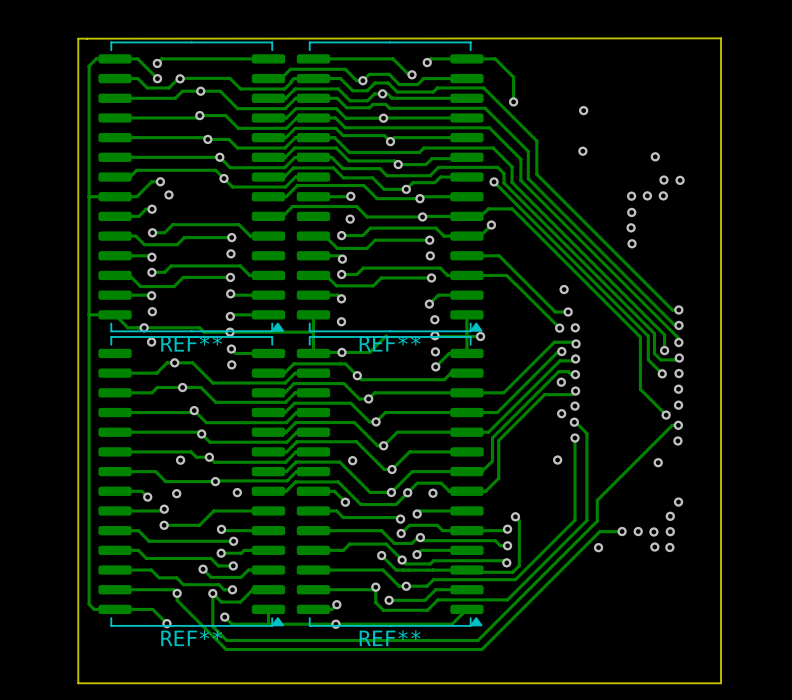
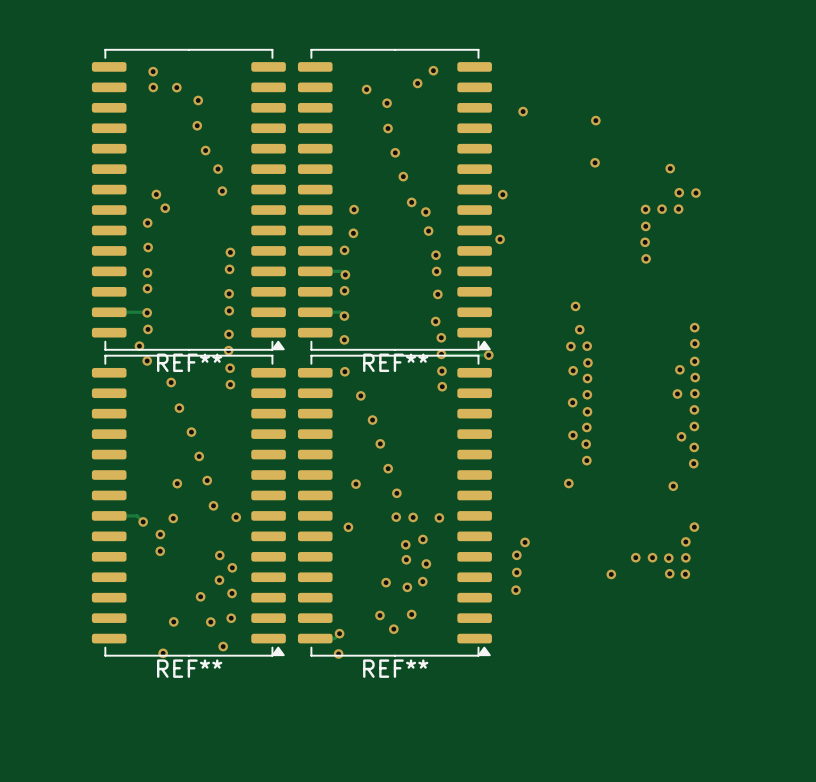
board edge: (78, 38) (721, 38) (721, 683) (78, 683) (78, 38) -> none
track: (268, 58) (161, 58) (157, 63) -> none
track: (313, 58) (393, 58) (408, 74) (412, 74) -> none
track: (427, 62) (430, 58) (495, 58) (513, 77) (513, 101) -> none
track: (115, 78) (137, 78) (147, 87) (168, 87) (180, 78) (229, 78) (240, 88) (284, 88) (293, 78) (340, 78) (352, 90) (367, 90) (374, 83) (388, 83) (397, 92) (433, 92) (437, 87) (483, 87) (536, 140) (536, 174) (672, 309) (678, 309) -> none
track: (157, 78) (137, 58) (96, 58) (89, 66) (89, 604) (94, 609) (152, 609) (166, 623) -> none
track: (466, 78) (423, 78) (417, 84) (399, 84) (389, 74) (369, 74) (362, 80) (356, 80) (345, 69) (290, 69) (281, 78) (268, 78) -> none
track: (391, 97) (387, 93) (374, 93) (367, 100) (350, 100) (338, 88) (295, 88) (285, 98) (268, 98) -> none
track: (391, 97) (466, 98) -> none
track: (115, 98) (175, 98) (182, 91) (220, 91) (237, 108) (285, 108) (295, 98) (337, 98) (346, 107) (369, 107) (372, 104) (385, 104) (389, 108) (485, 108) (528, 151) (528, 178) (674, 325) (679, 325) -> none
track: (115, 117) (197, 117) (199, 115) (225, 115) (238, 128) (286, 128) (296, 117) (335, 117) (345, 127) (489, 127) (520, 159) (520, 180) (678, 338) (678, 342) -> none
track: (466, 117) (345, 118) (336, 108) (295, 108) (286, 117) (268, 117) -> none
track: (115, 137) (228, 139) (237, 148) (285, 148) (295, 137) (334, 137) (349, 152) (419, 152) (423, 148) (493, 148) (512, 166) (512, 182) (664, 334) (664, 350) -> none
track: (466, 137) (394, 137) (390, 141) (384, 135) (343, 135) (335, 128) (295, 128) (285, 137) (268, 137) -> none
track: (219, 157) (230, 167) (284, 167) (295, 157) (331, 157) (342, 168) (379, 168) (386, 175) (430, 175) (438, 167) (497, 167) (503, 173) (503, 183) (654, 333) (654, 353) (660, 359) (677, 359) (679, 358) -> none
track: (219, 157) (115, 157) -> none
track: (466, 157) (431, 158) (426, 164) (398, 164) (394, 160) (349, 160) (336, 148) (294, 148) (285, 157) (268, 157) -> none
track: (313, 177) (295, 177) (285, 187) (232, 187) (215, 170) (136, 170) (129, 177) (115, 177) -> none
track: (466, 177) (440, 177) (434, 182) (412, 182) (406, 189) (384, 189) (372, 177) (343, 177) (333, 167) (293, 167) (284, 177) (268, 177) -> none
track: (160, 181) (151, 181) (136, 196) (89, 196) -> none
track: (494, 181) (648, 336) (648, 359) (662, 373) -> none
track: (350, 196) (313, 196) -> none
track: (466, 196) (377, 198) (363, 185) (297, 185) (286, 196) (268, 196) -> none
track: (152, 209) (146, 209) (138, 216) (115, 216) -> none
track: (268, 216) (282, 216) (292, 206) (356, 206) (367, 216) (480, 216) (488, 208) (512, 208) (640, 337) (640, 389) (666, 415) -> none
track: (491, 225) (480, 236) (443, 236) (435, 228) (370, 228) (362, 235) (341, 235) -> none
track: (152, 232) (164, 232) (172, 224) (239, 224) (250, 236) (268, 236) -> none
track: (115, 236) (135, 236) (144, 244) (177, 244) (184, 237) (231, 237) -> none
track: (313, 236) (324, 236) (337, 248) (366, 248) (375, 240) (429, 240) -> none
track: (115, 255) (151, 257) -> none
track: (466, 255) (499, 255) (555, 311) (568, 311) -> none
track: (152, 272) (164, 272) (171, 265) (240, 265) (249, 275) (268, 275) -> none
track: (341, 274) (356, 274) (363, 268) (440, 268) (447, 275) (506, 275) (514, 283) -> none
track: (115, 275) (129, 275) (140, 286) (174, 286) (183, 277) (230, 277) -> none
track: (313, 275) (326, 275) (336, 285) (373, 285) (381, 277) (431, 277) -> none
track: (515, 283) (559, 328) -> none
track: (230, 293) (268, 295) -> none
track: (466, 295) (438, 295) (429, 304) -> none
track: (89, 314) (115, 314) (127, 327) (199, 327) (203, 332) (313, 332) -> none
track: (268, 314) (231, 314) (230, 316) -> none
track: (313, 314) (313, 353) (369, 352) (386, 335) -> none
track: (466, 314) (466, 353) (449, 353) (435, 366) -> none
track: (576, 343) (574, 342) (554, 342) (503, 392) (374, 392) (368, 398) (359, 398) (343, 383) (294, 383) (284, 392) (268, 392) -> none
track: (231, 349) (235, 353) (268, 353) -> none
track: (561, 351) (558, 351) (497, 412) (385, 412) (376, 421) (369, 421) (350, 403) (294, 403) (285, 412) (268, 412) -> none
track: (575, 358) (573, 360) (559, 360) (488, 432) (397, 432) (383, 445) (377, 445) (354, 422) (295, 422) (286, 432) (268, 432) -> none
track: (340, 363) (293, 363) (284, 373) (268, 373) -> none
track: (340, 363) (345, 363) (361, 379) (444, 379) (451, 373) (466, 373) -> none
track: (313, 373) (295, 373) (285, 382) (212, 382) (192, 362) (167, 362) (156, 373) (115, 373) -> none
track: (575, 374) (571, 374) (568, 371) (558, 371) (492, 437) (492, 460) (481, 471) (412, 471) (391, 492) (370, 492) (339, 462) (295, 462) (286, 471) (268, 471) -> none
track: (575, 391) (572, 394) (544, 394) (498, 440) (498, 478) (485, 491) (449, 491) (441, 483) (417, 483) (395, 504) (360, 504) (338, 481) (295, 481) (286, 491) (268, 491) -> none
track: (313, 392) (295, 392) (285, 402) (215, 402) (200, 387) (157, 387) (151, 392) (115, 392) -> none
track: (313, 412) (296, 412) (286, 422) (206, 422) (194, 410) (192, 412) (115, 412) -> none
track: (574, 422) (586, 433) (586, 520) (507, 599) (437, 599) (427, 610) (383, 610) (375, 602) (375, 587) (373, 589) (313, 589) -> none
track: (678, 425) (672, 425) (597, 500) (597, 521) (477, 640) (226, 640) (212, 626) (212, 593) (221, 602) (240, 602) (252, 589) (268, 589) -> none
track: (313, 432) (296, 432) (286, 442) (209, 442) (199, 432) (115, 432) -> none
track: (574, 438) (574, 520) (515, 579) (433, 579) (426, 586) (399, 586) (382, 570) (313, 570) -> none
track: (313, 451) (296, 451) (285, 462) (214, 462) (209, 457) (196, 457) (191, 451) (115, 451) -> none
track: (466, 451) (409, 451) (392, 469) (384, 469) (356, 441) (296, 441) (286, 451) (268, 451) -> none
track: (313, 471) (296, 471) (287, 480) (215, 481) (165, 481) (155, 471) (115, 471) -> none
track: (313, 491) (334, 491) (345, 502) -> none
track: (164, 509) (162, 510) (115, 510) -> none
track: (268, 510) (213, 510) (199, 525) (164, 525) -> none
track: (313, 510) (336, 510) (343, 517) (399, 517) (400, 519) -> none
track: (466, 510) (420, 510) (417, 513) -> none
track: (515, 516) (519, 520) (519, 565) (512, 572) (396, 570) (381, 555) -> none
track: (221, 529) (268, 530) -> none
track: (507, 529) (442, 530) (437, 525) (409, 525) (401, 533) -> none
track: (115, 530) (138, 530) (149, 541) (233, 541) -> none
track: (313, 530) (381, 530) (394, 543) (412, 543) (420, 537) (423, 540) (495, 540) (500, 545) (507, 545) -> none
track: (621, 531) (599, 531) (481, 649) (226, 649) (177, 600) (177, 593) (173, 589) (115, 589) -> none
track: (115, 550) (138, 550) (146, 558) (210, 558) (218, 565) (233, 565) -> none
track: (268, 550) (221, 553) -> none
track: (313, 550) (343, 550) (349, 544) (386, 544) (406, 563) (430, 563) (433, 560) (504, 560) (506, 562) -> none
track: (466, 550) (421, 550) (417, 554) -> none
track: (203, 569) (211, 577) (241, 577) (248, 570) (268, 570) -> none
track: (115, 570) (151, 570) (159, 577) (176, 577) (183, 584) (219, 584) (224, 589) (232, 589) -> none
track: (466, 589) (435, 589) (425, 600) (389, 600) -> none
track: (268, 609) (267, 624) -> none
track: (466, 609) (452, 624) (231, 624) (224, 617) -> none

